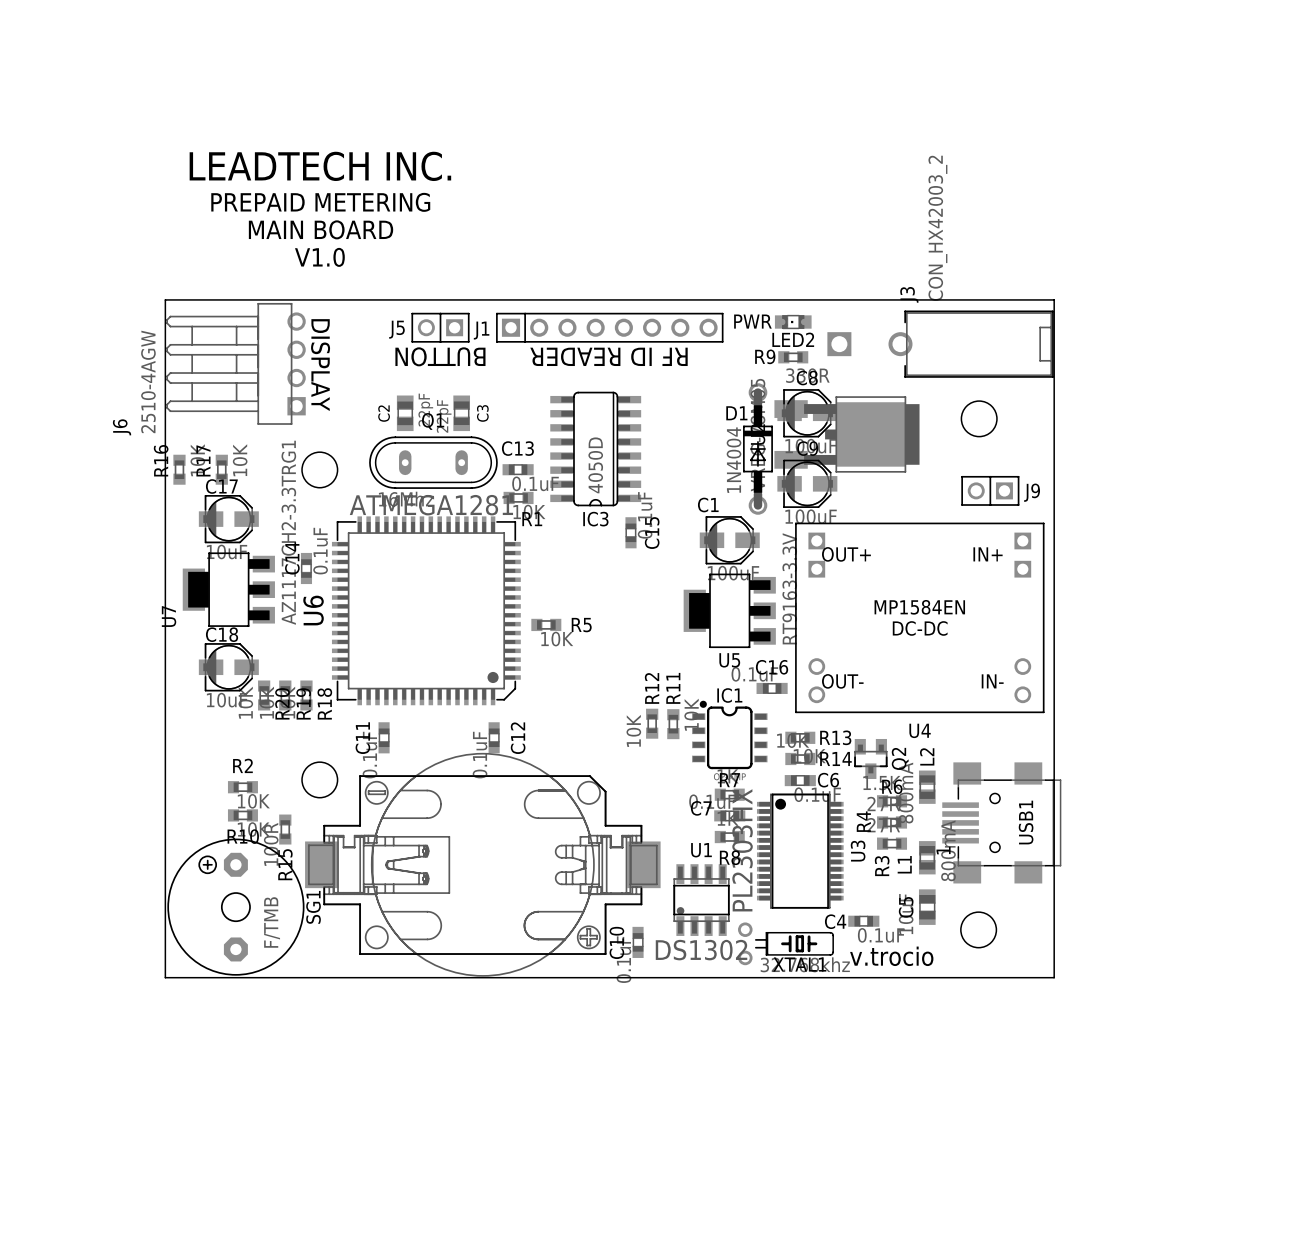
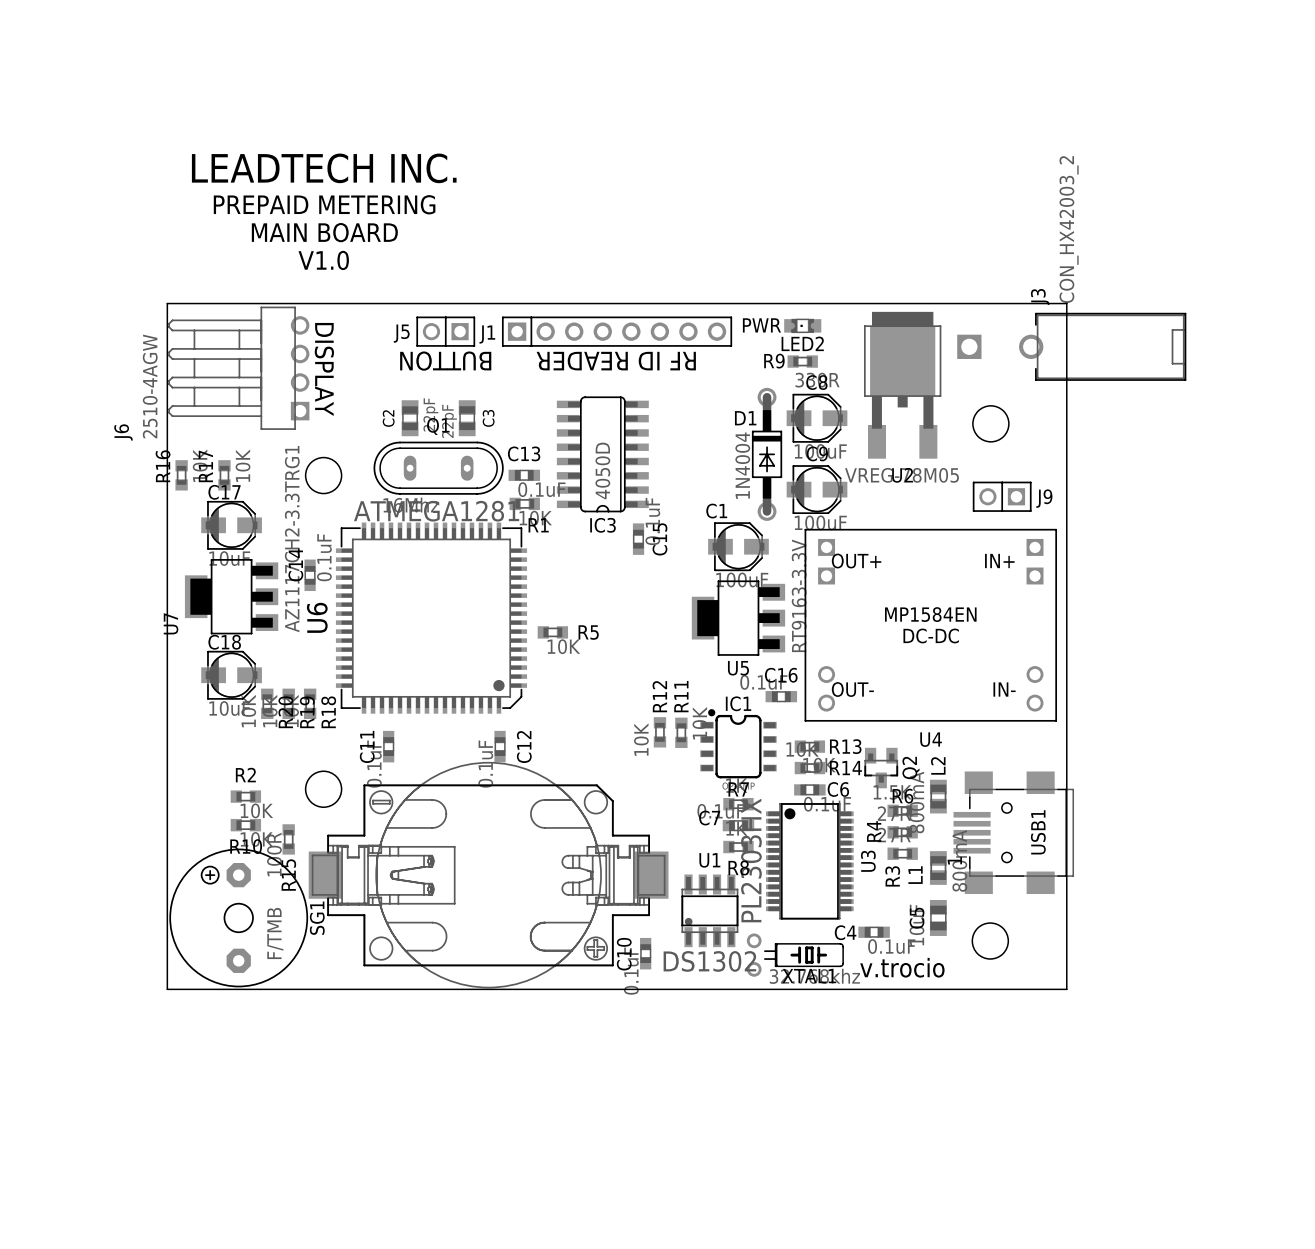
J3 position: (940, 344) -> (1071, 346)
U2 rotation: 0° (846, 434) -> 90° counterclockwise (902, 385)

